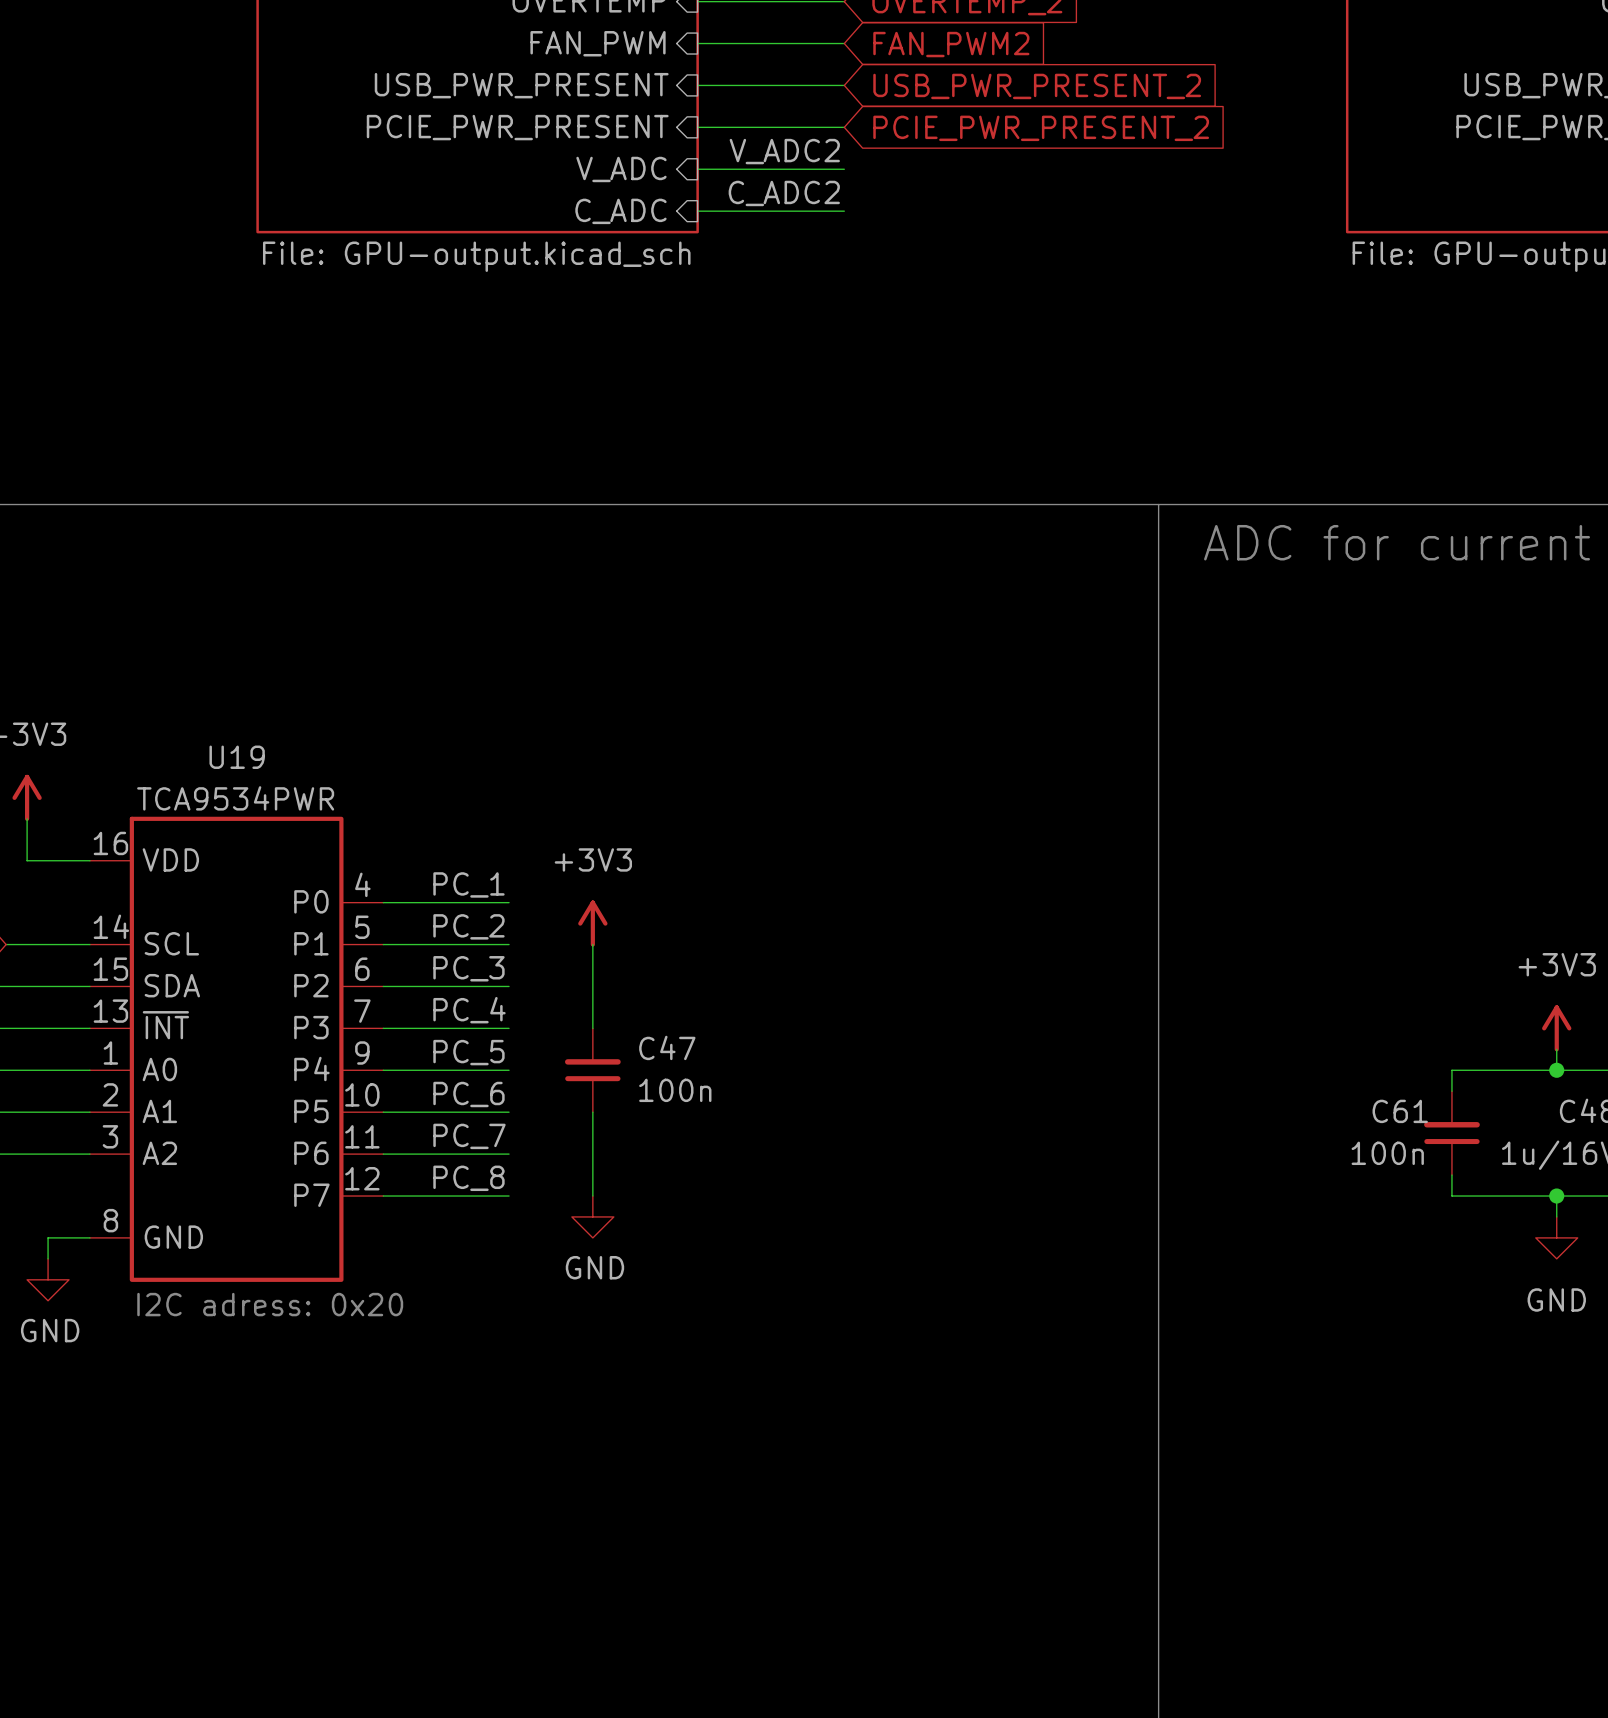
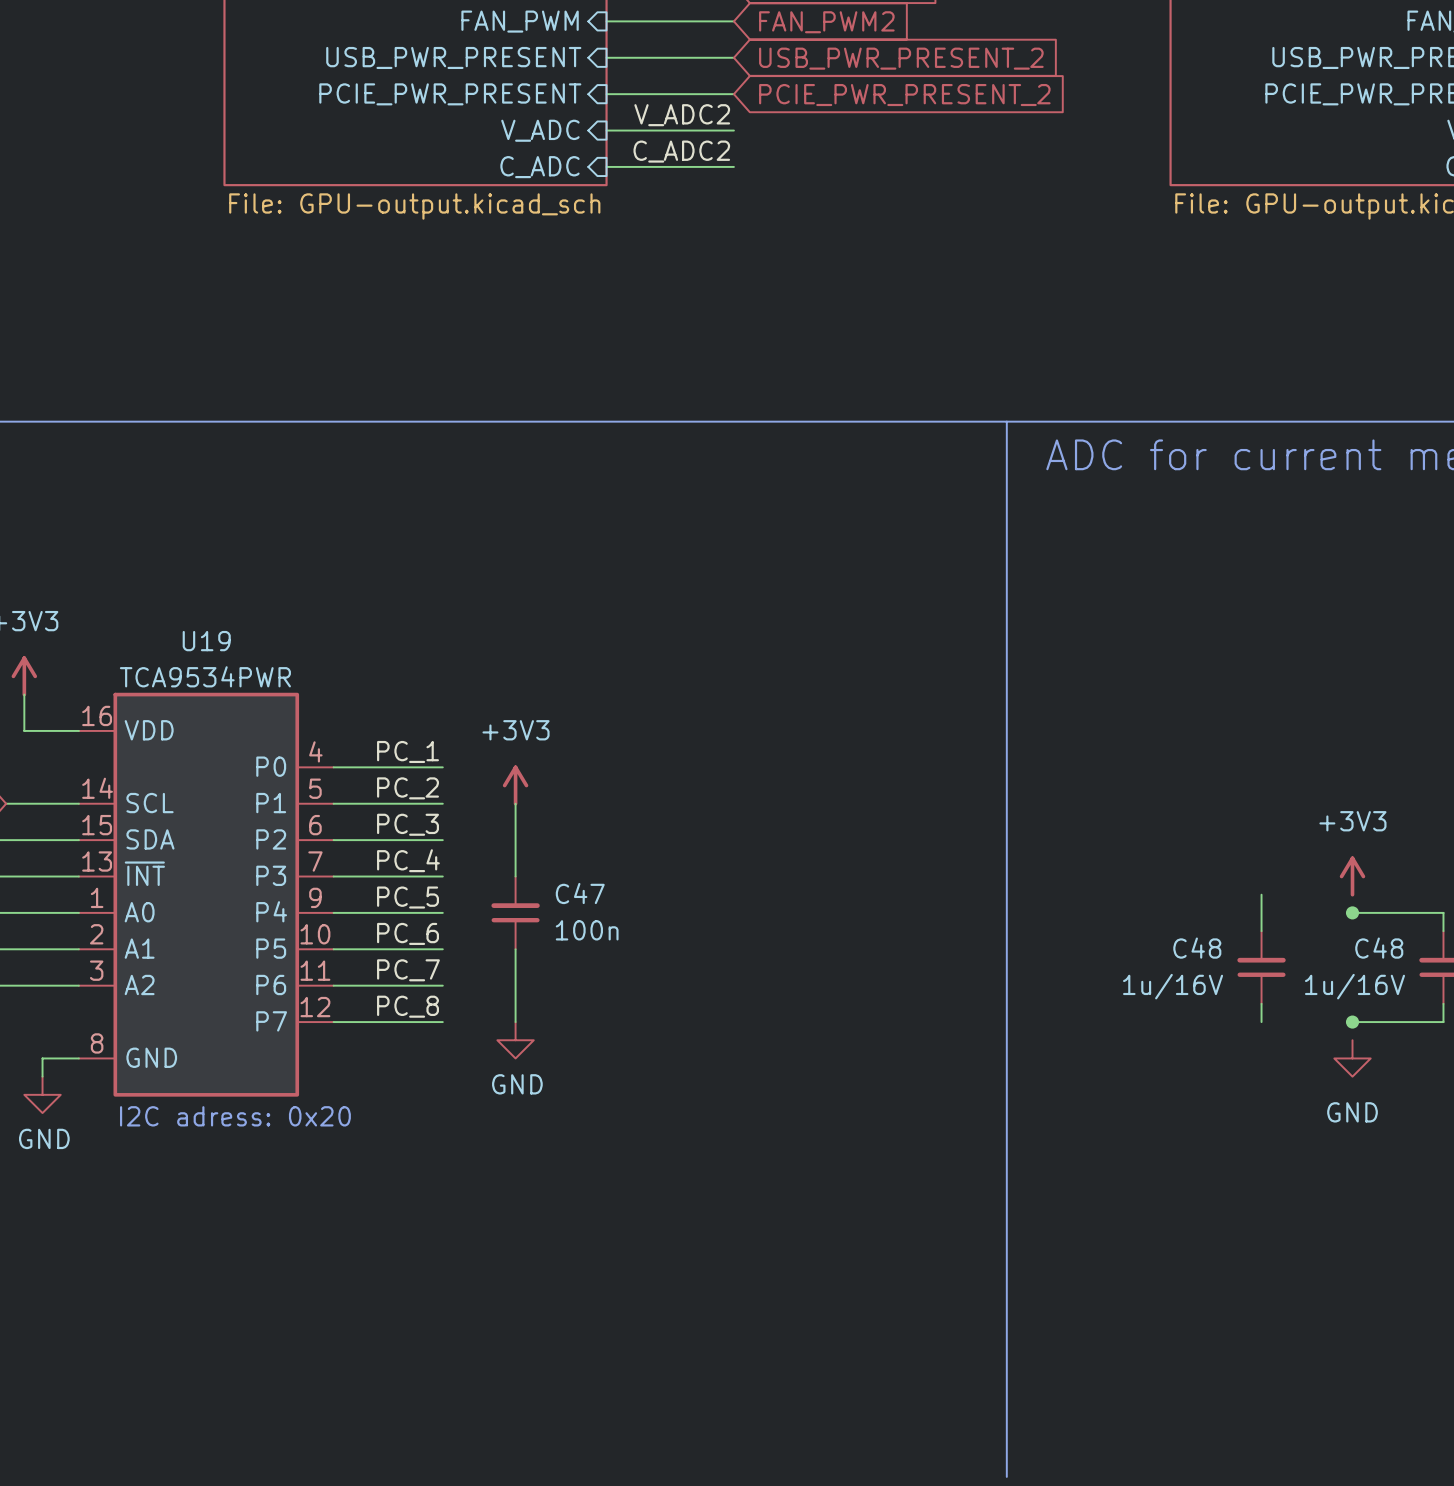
wire: (1556, 1049) (1556, 1070) (1451, 1070) -> (1261, 894) (1261, 912)
C61 name: C61 (1400, 1111) -> C48 (1197, 948)
C61 text: 100n (1387, 1153) -> 1u/16V (1173, 986)
wire: (1451, 1196) (1556, 1196) (1556, 1216) -> none

